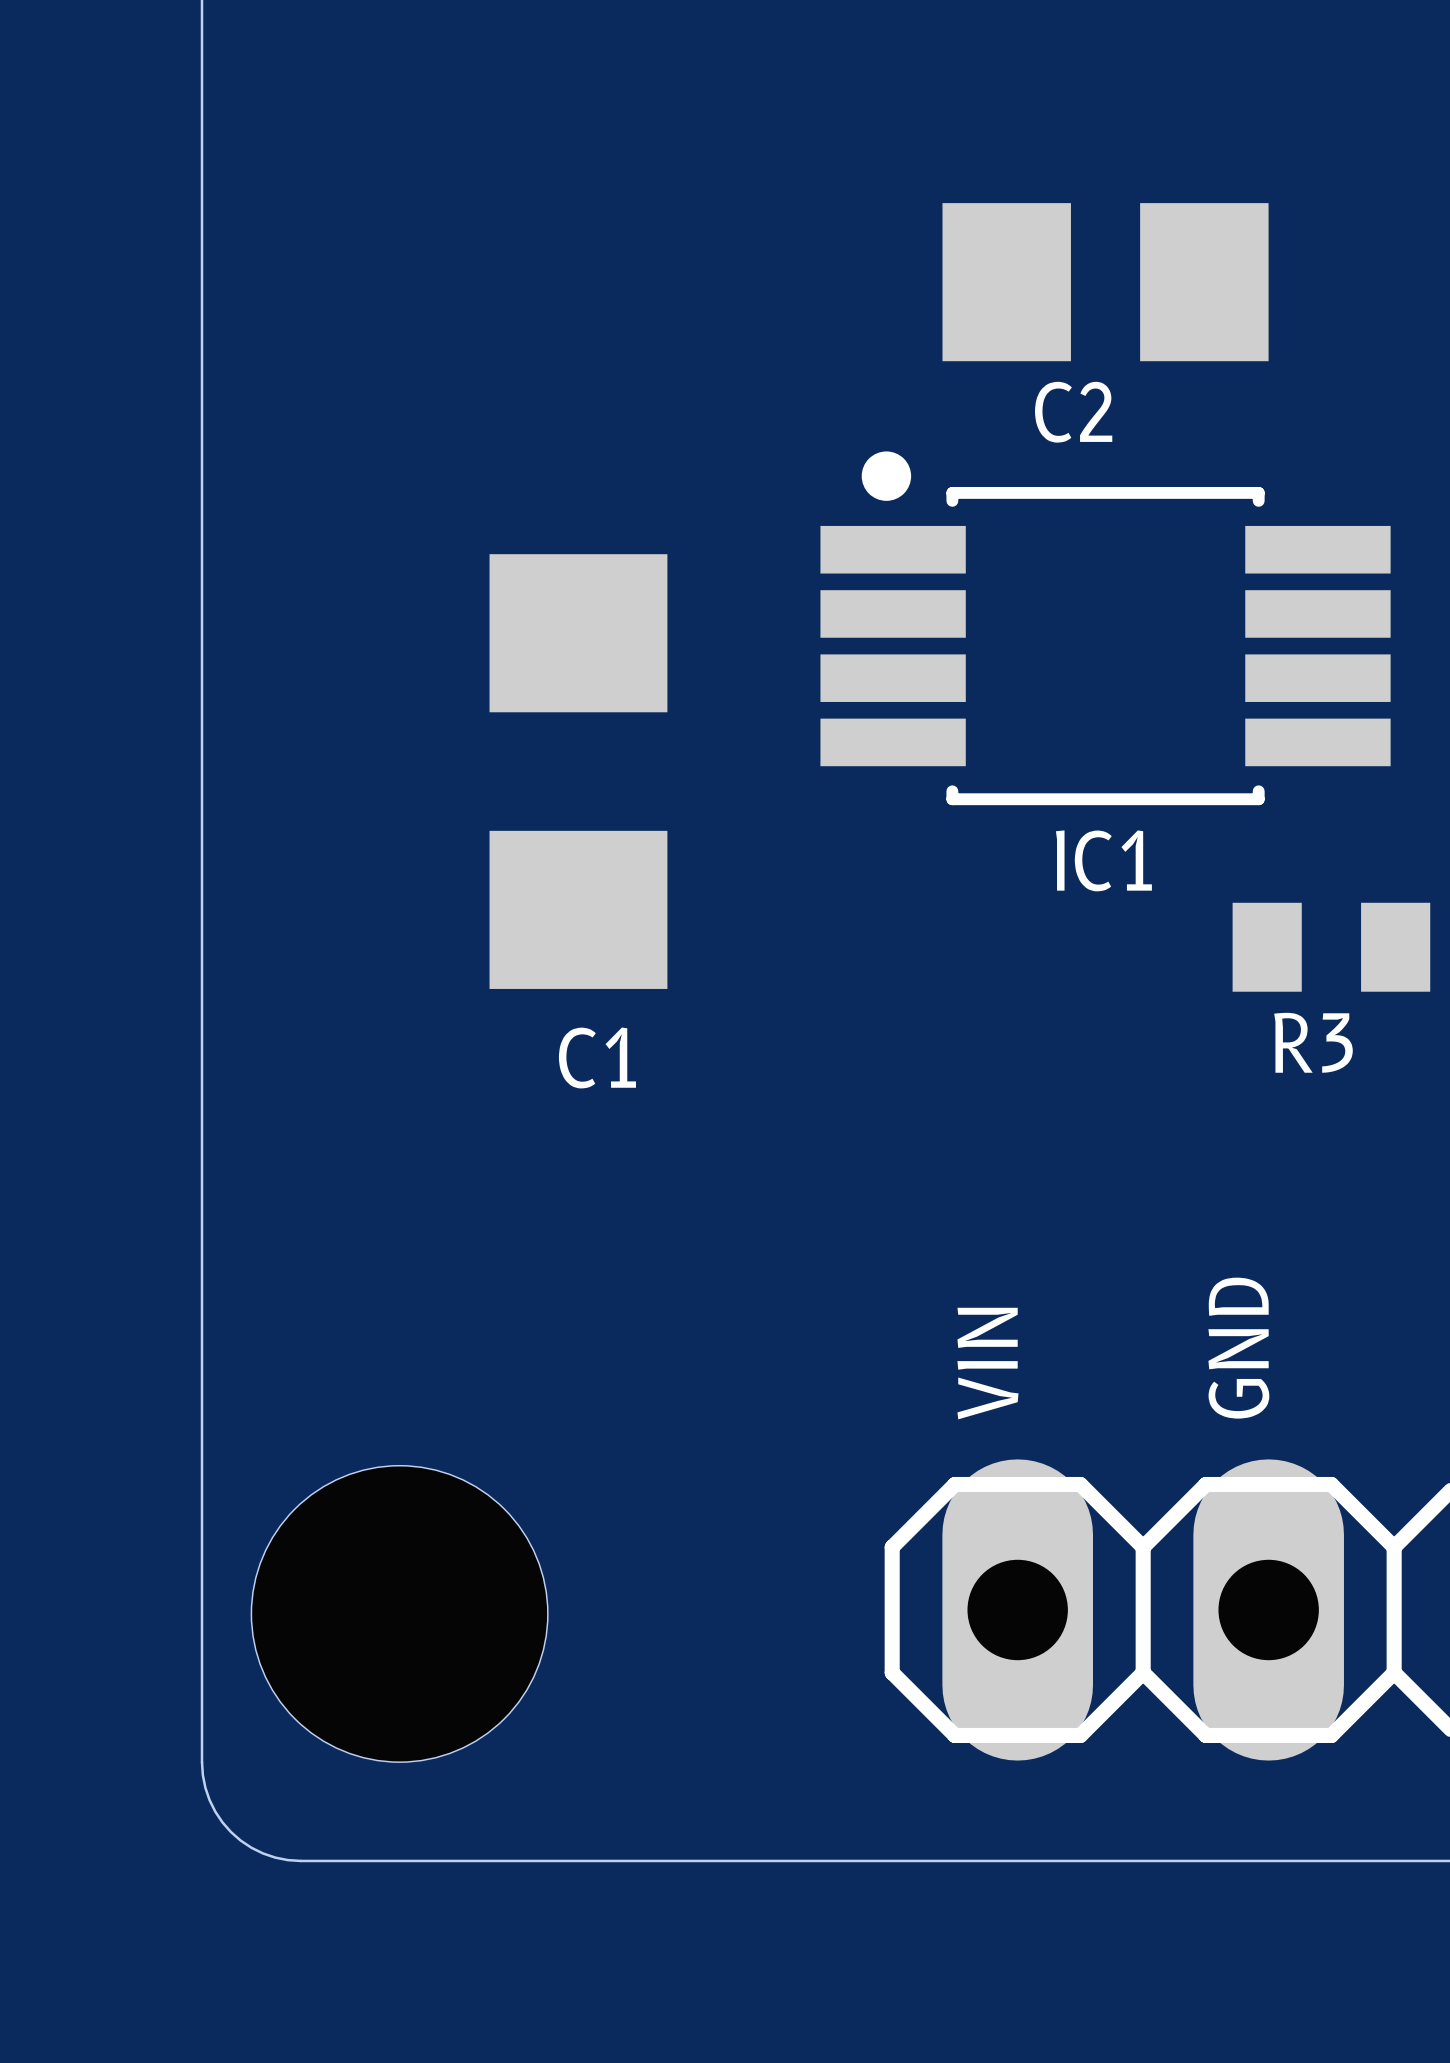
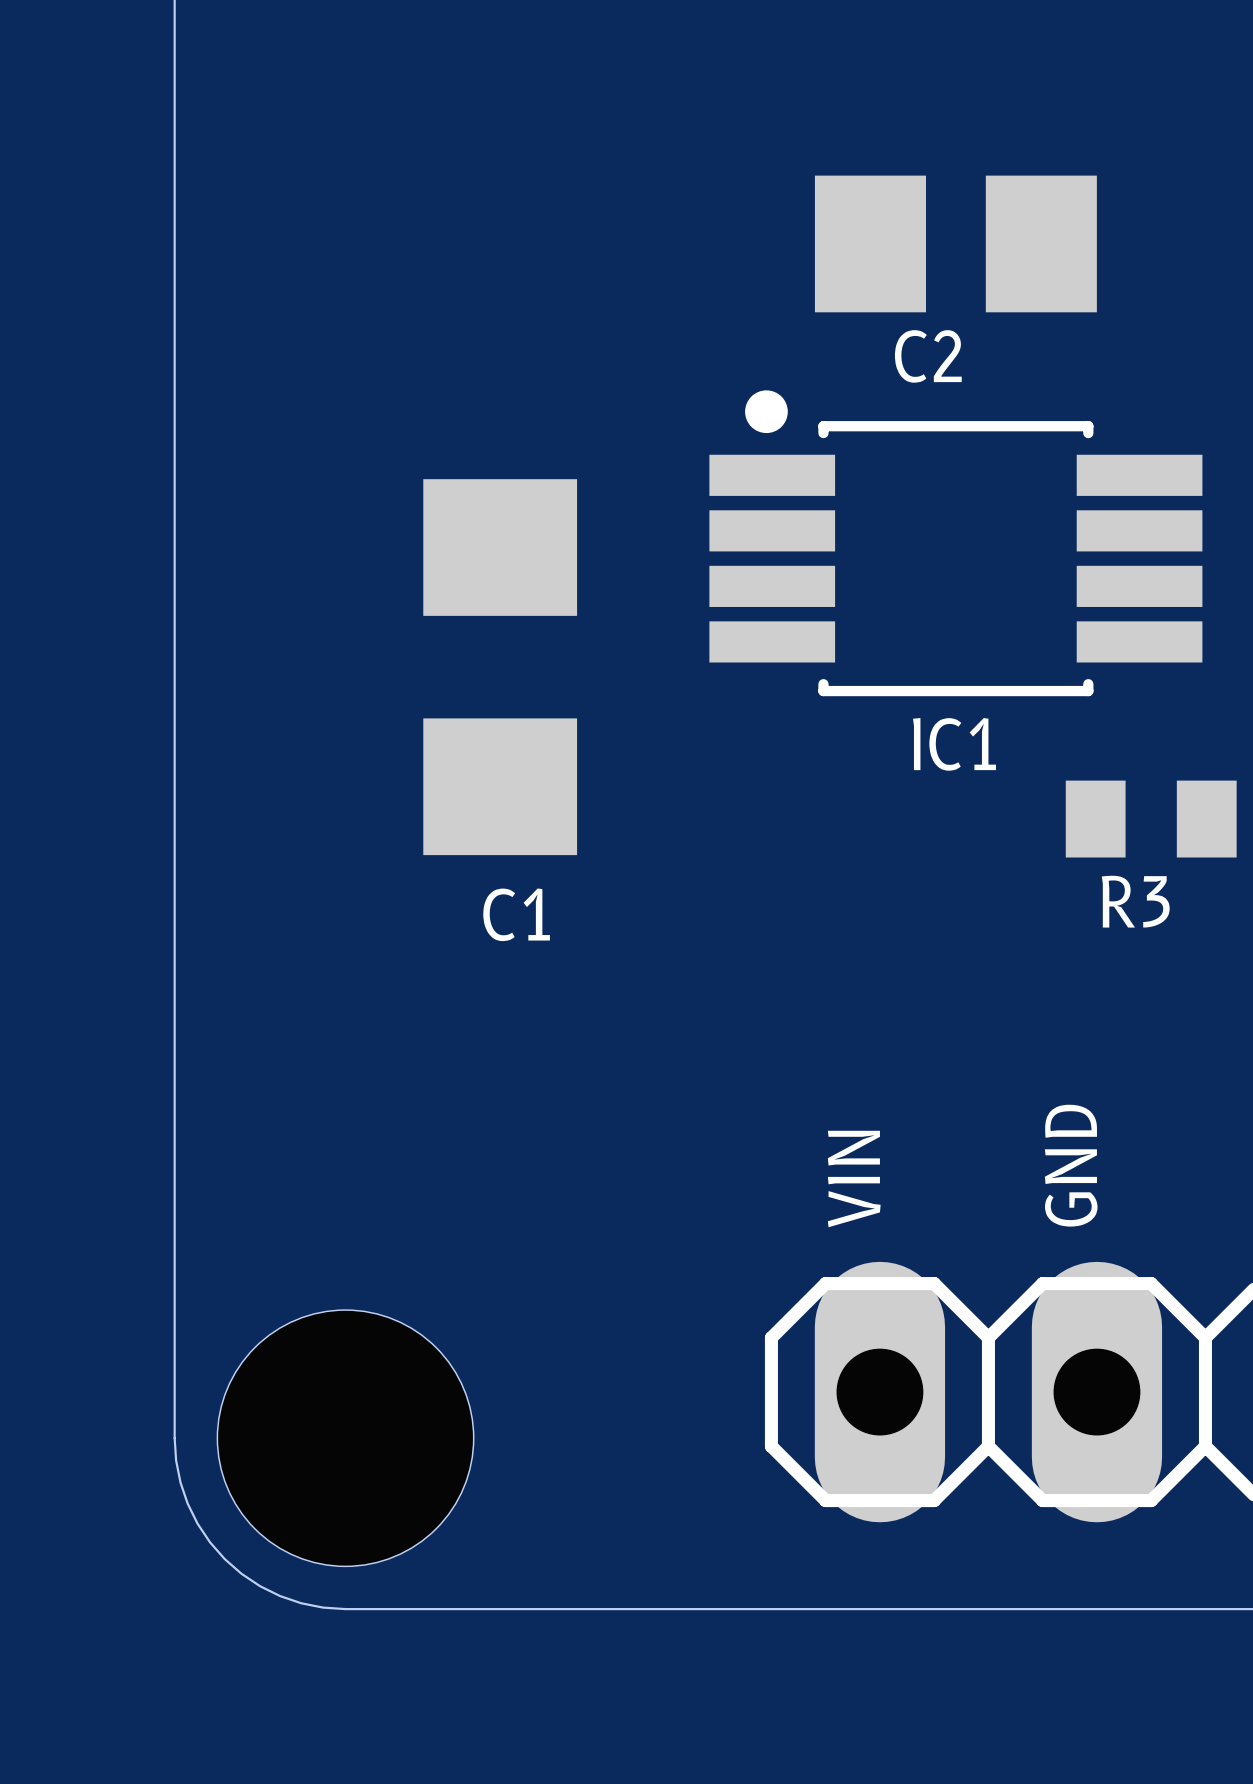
hole position: (399, 1613) -> (345, 1438)
board edge: (202, 1663) (202, 1775) (209, 1799) (222, 1822) (230, 1832) (240, 1840) (263, 1853) (287, 1860) (399, 1860) -> (174, 1438) (180, 1482) (187, 1503) (197, 1523) (224, 1559) (260, 1586) (280, 1596) (301, 1603) (345, 1609)

